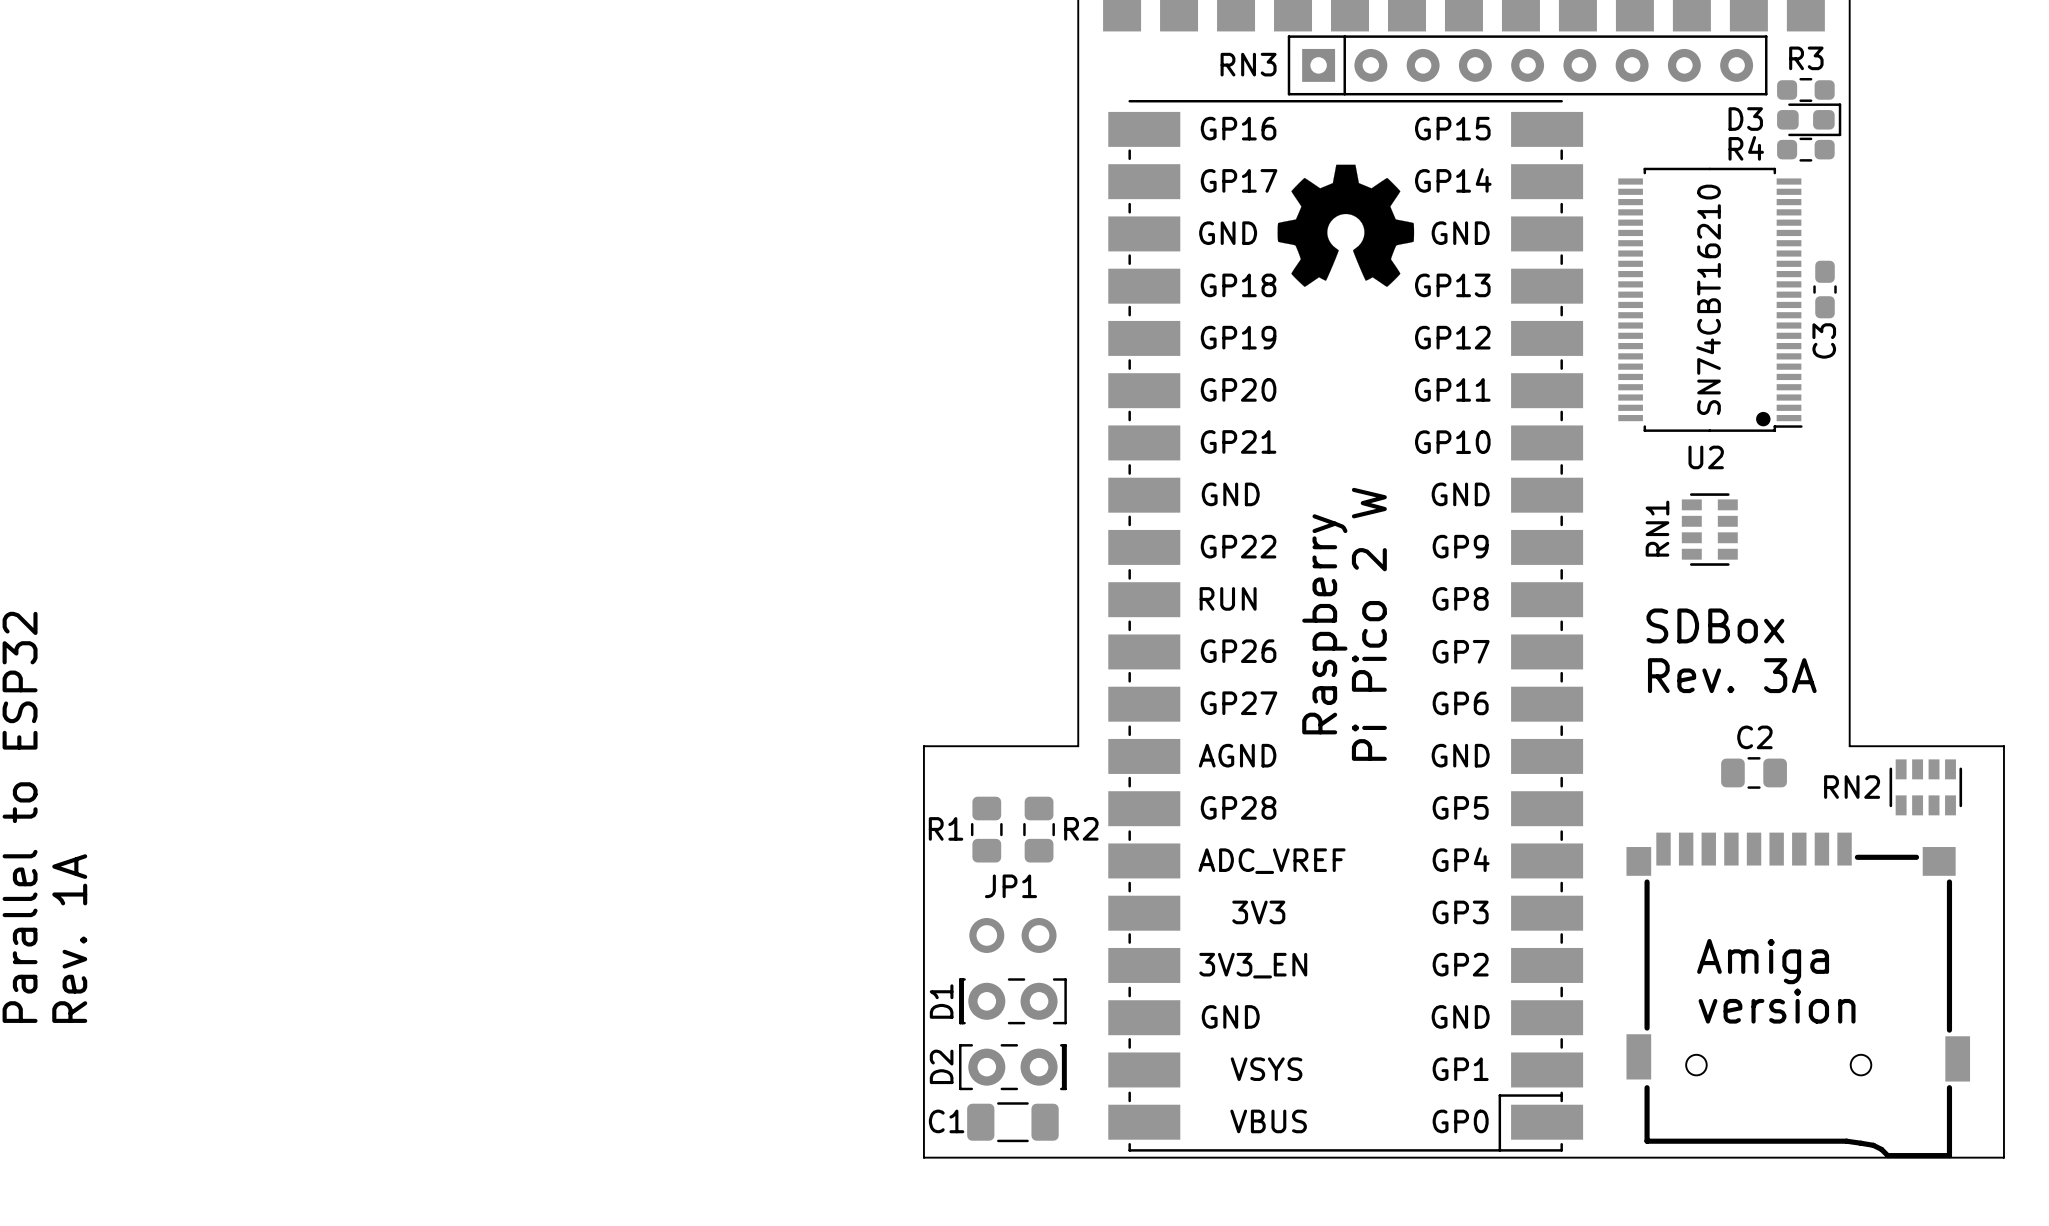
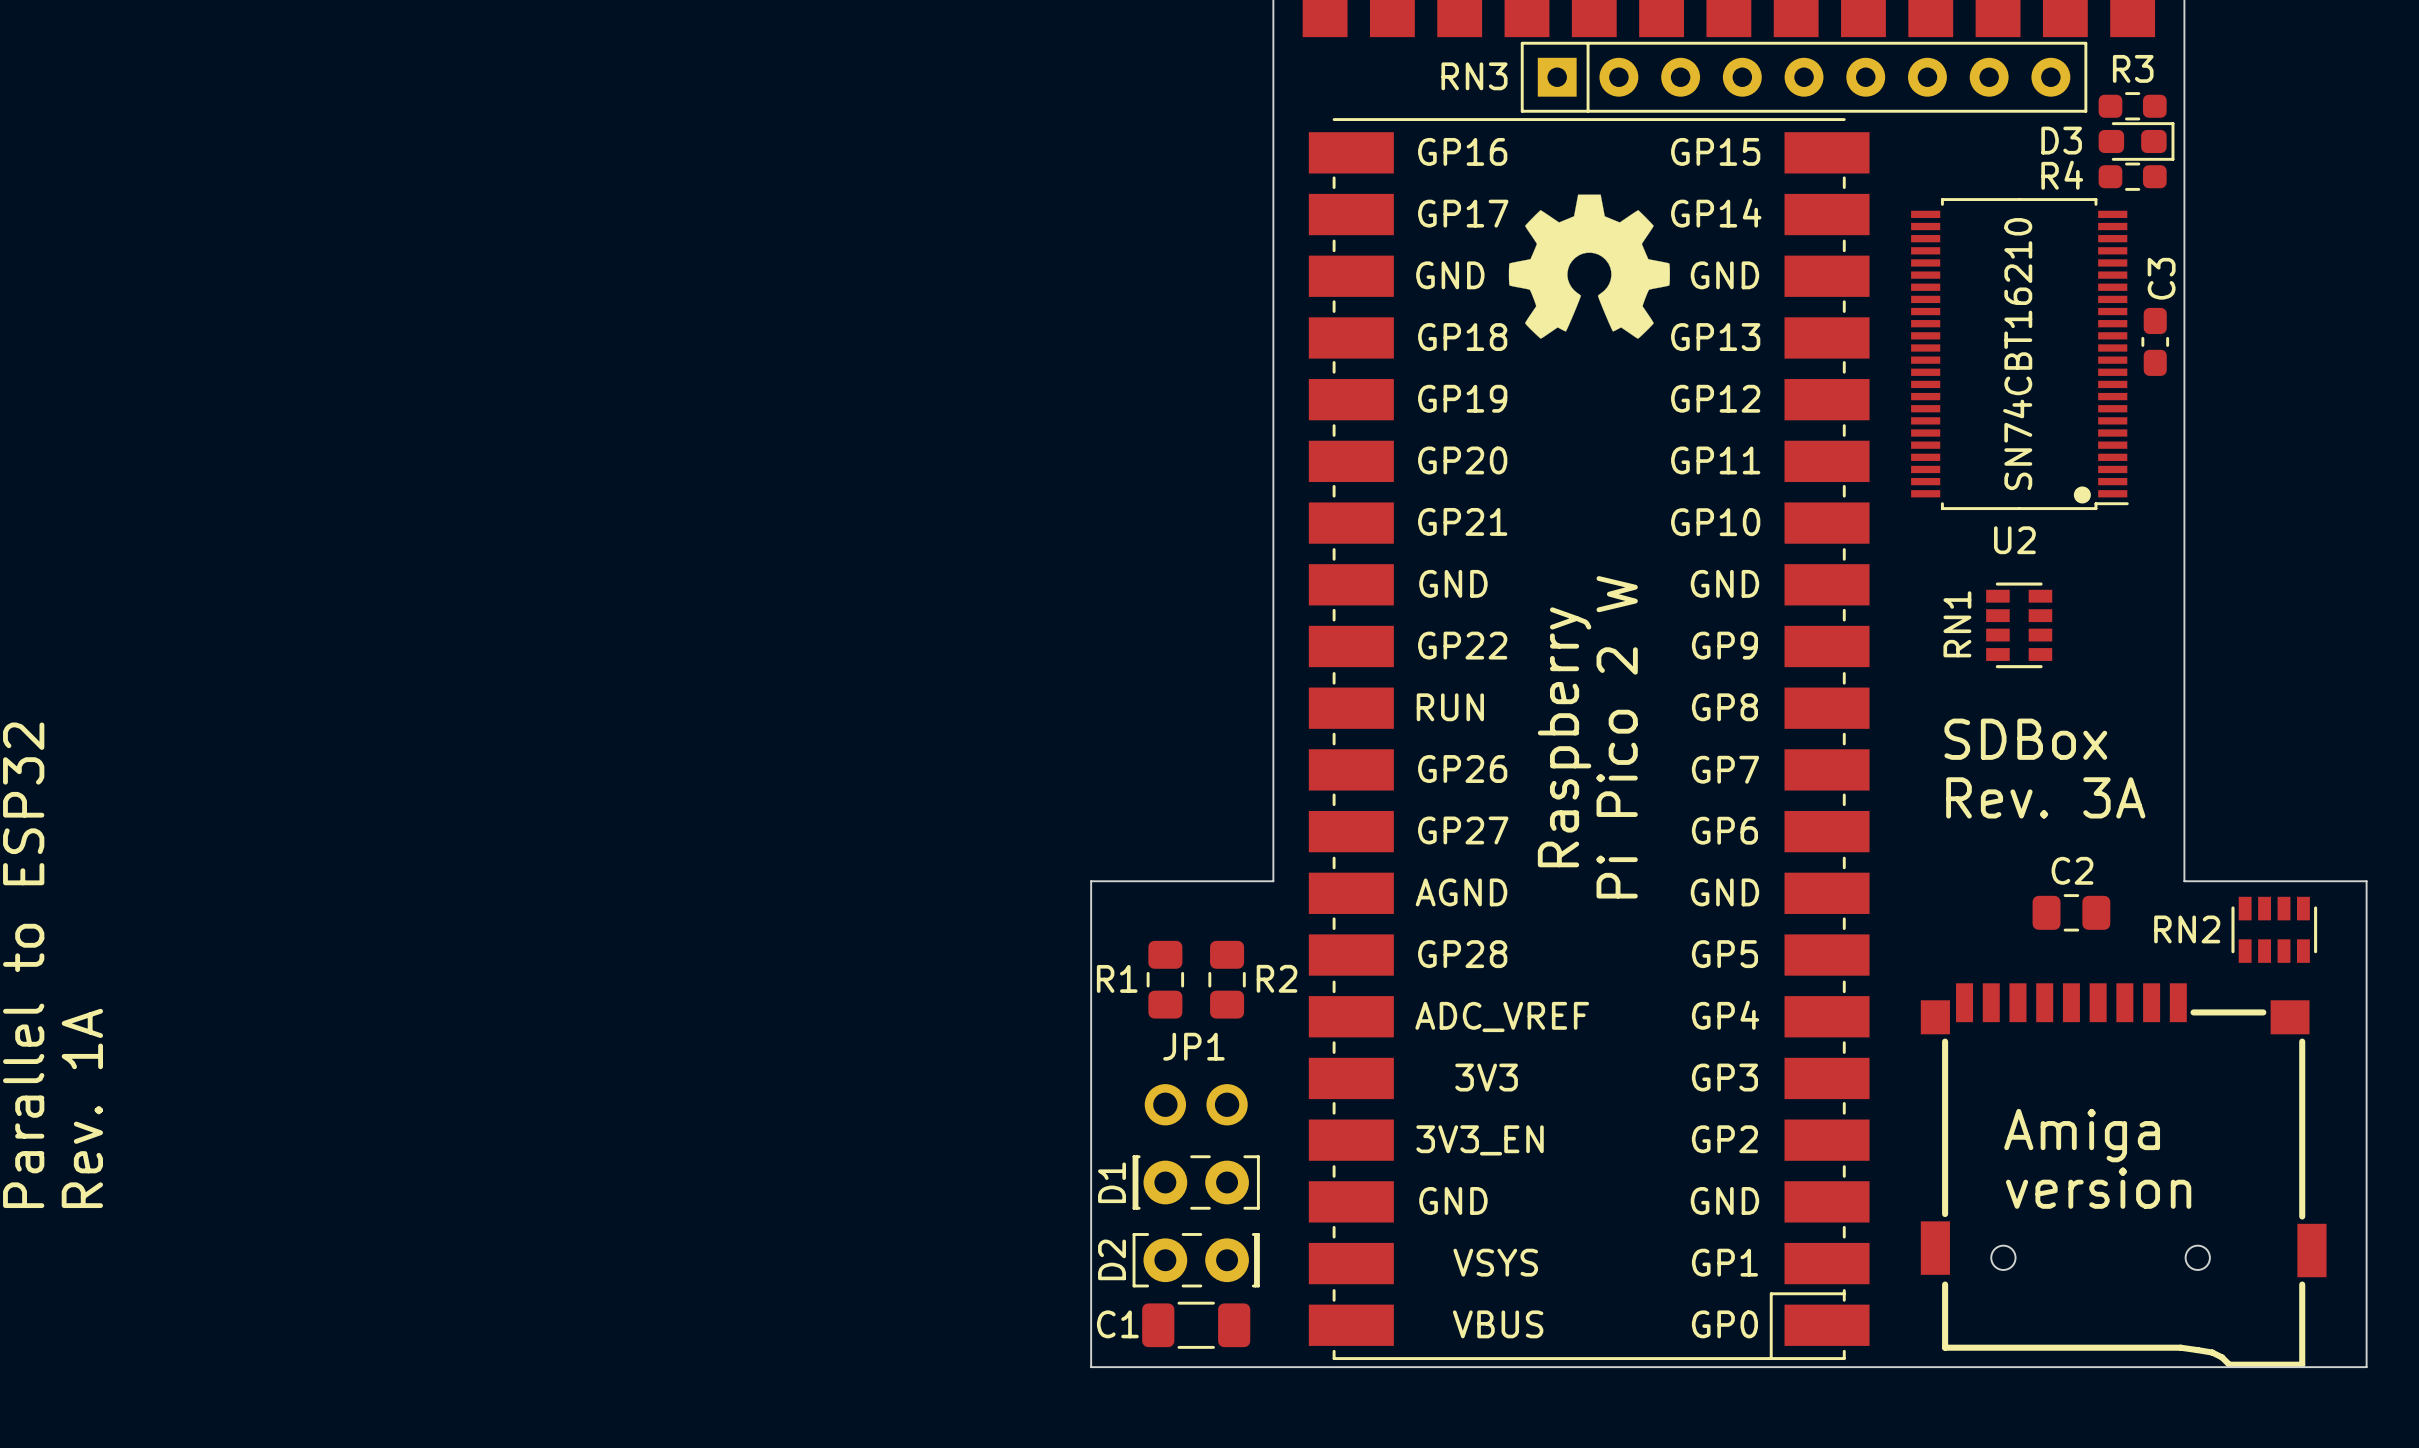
C3 name position: C3 (1824, 340) -> C3 (2161, 278)

